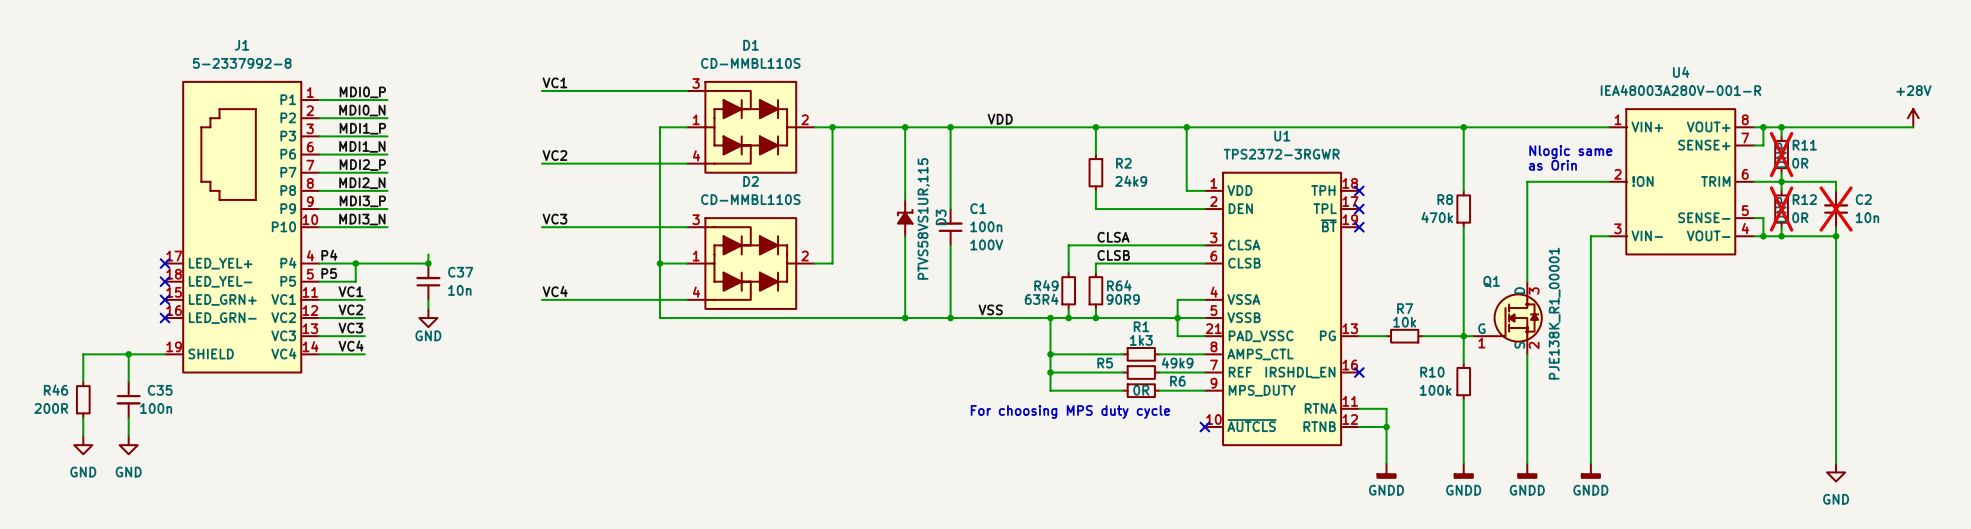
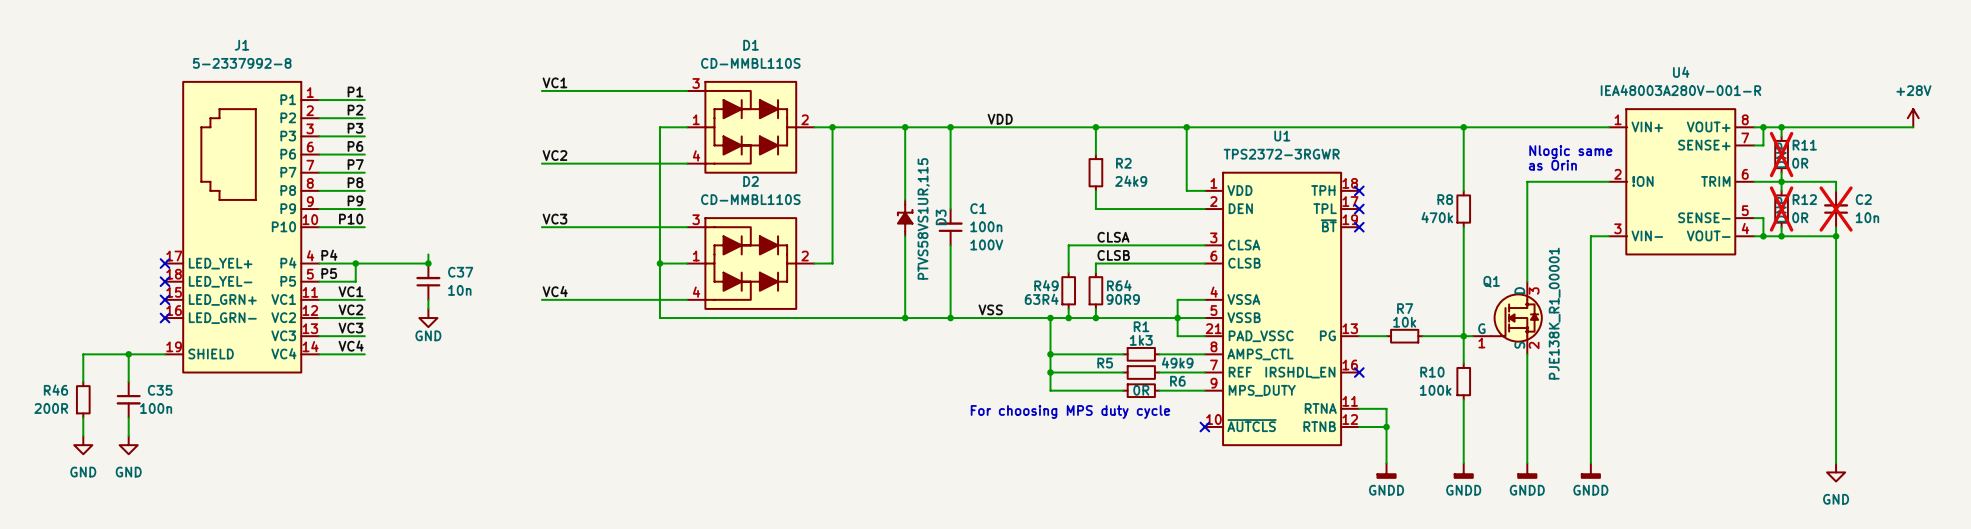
label: none -> P1 (355, 91)
label: MDI0_P (362, 92) -> none
wire: (364, 100) (387, 100) -> none
label: none -> P2 (355, 110)
label: MDI0_N (362, 110) -> none
wire: (364, 118) (387, 118) -> none
label: none -> P3 (355, 128)
label: MDI1_P (362, 128) -> none
wire: (364, 136) (387, 136) -> none
label: none -> P6 (355, 146)
label: MDI1_N (362, 146) -> none
wire: (364, 154) (387, 154) -> none
label: none -> P7 (355, 164)
label: MDI2_P (362, 165) -> none
wire: (364, 172) (387, 172) -> none
label: none -> P8 (355, 182)
label: MDI2_N (362, 183) -> none
wire: (364, 190) (387, 190) -> none
label: none -> P9 (355, 200)
label: MDI3_P (362, 201) -> none
wire: (364, 209) (387, 209) -> none
label: none -> P10 (351, 219)
label: MDI3_N (362, 219) -> none
wire: (364, 227) (387, 227) -> none

